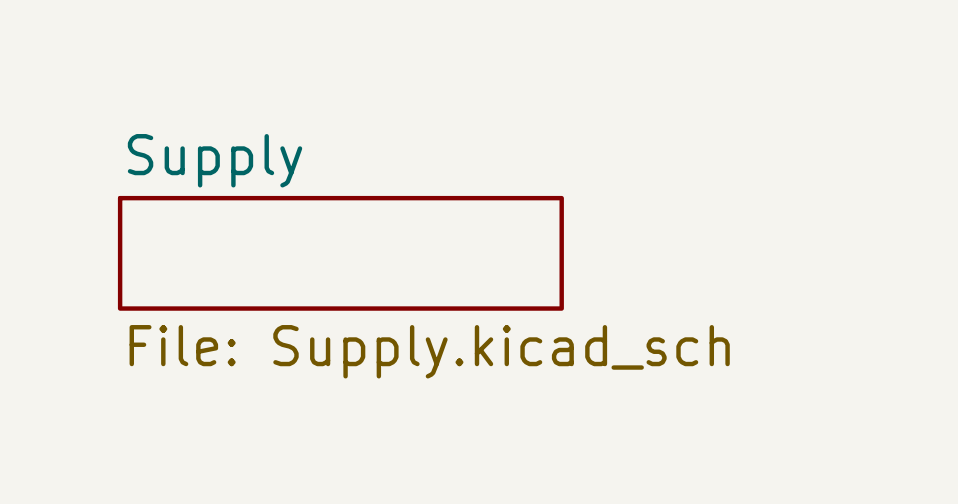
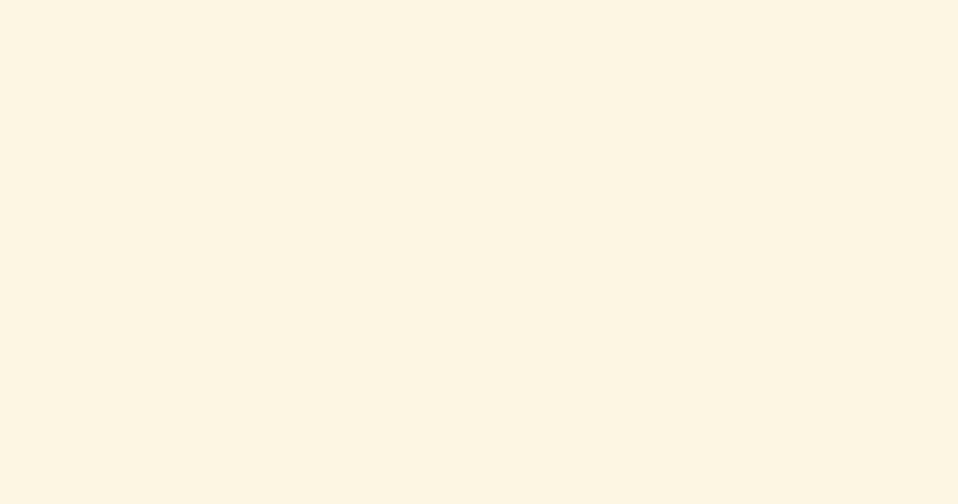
sheet Supply: File: Supply.kicad_sch (340, 253) -> none

